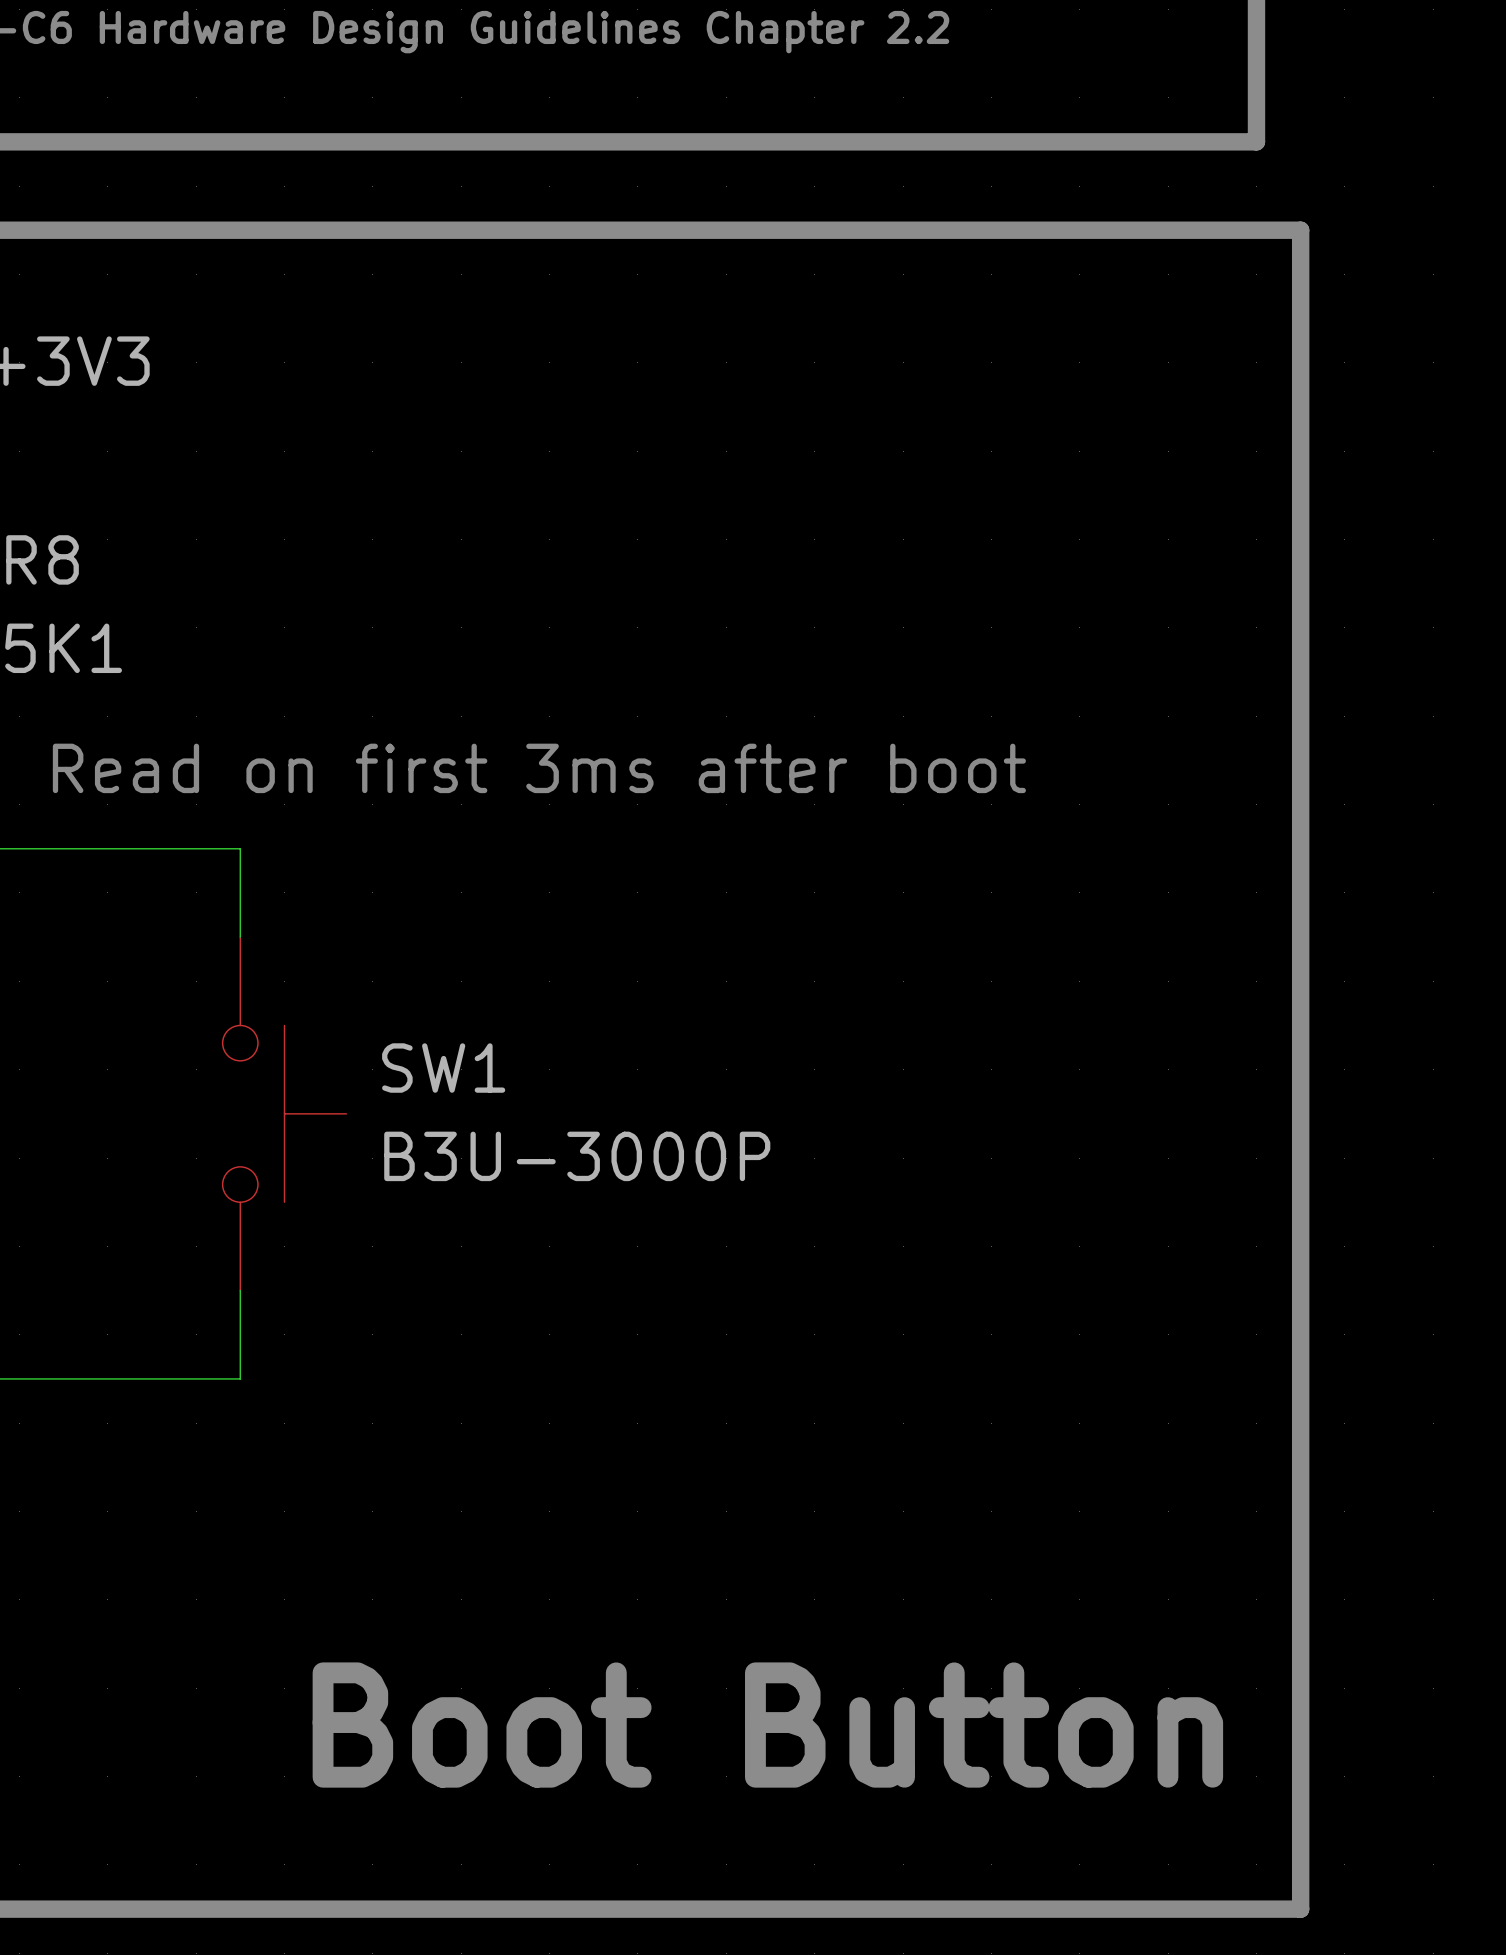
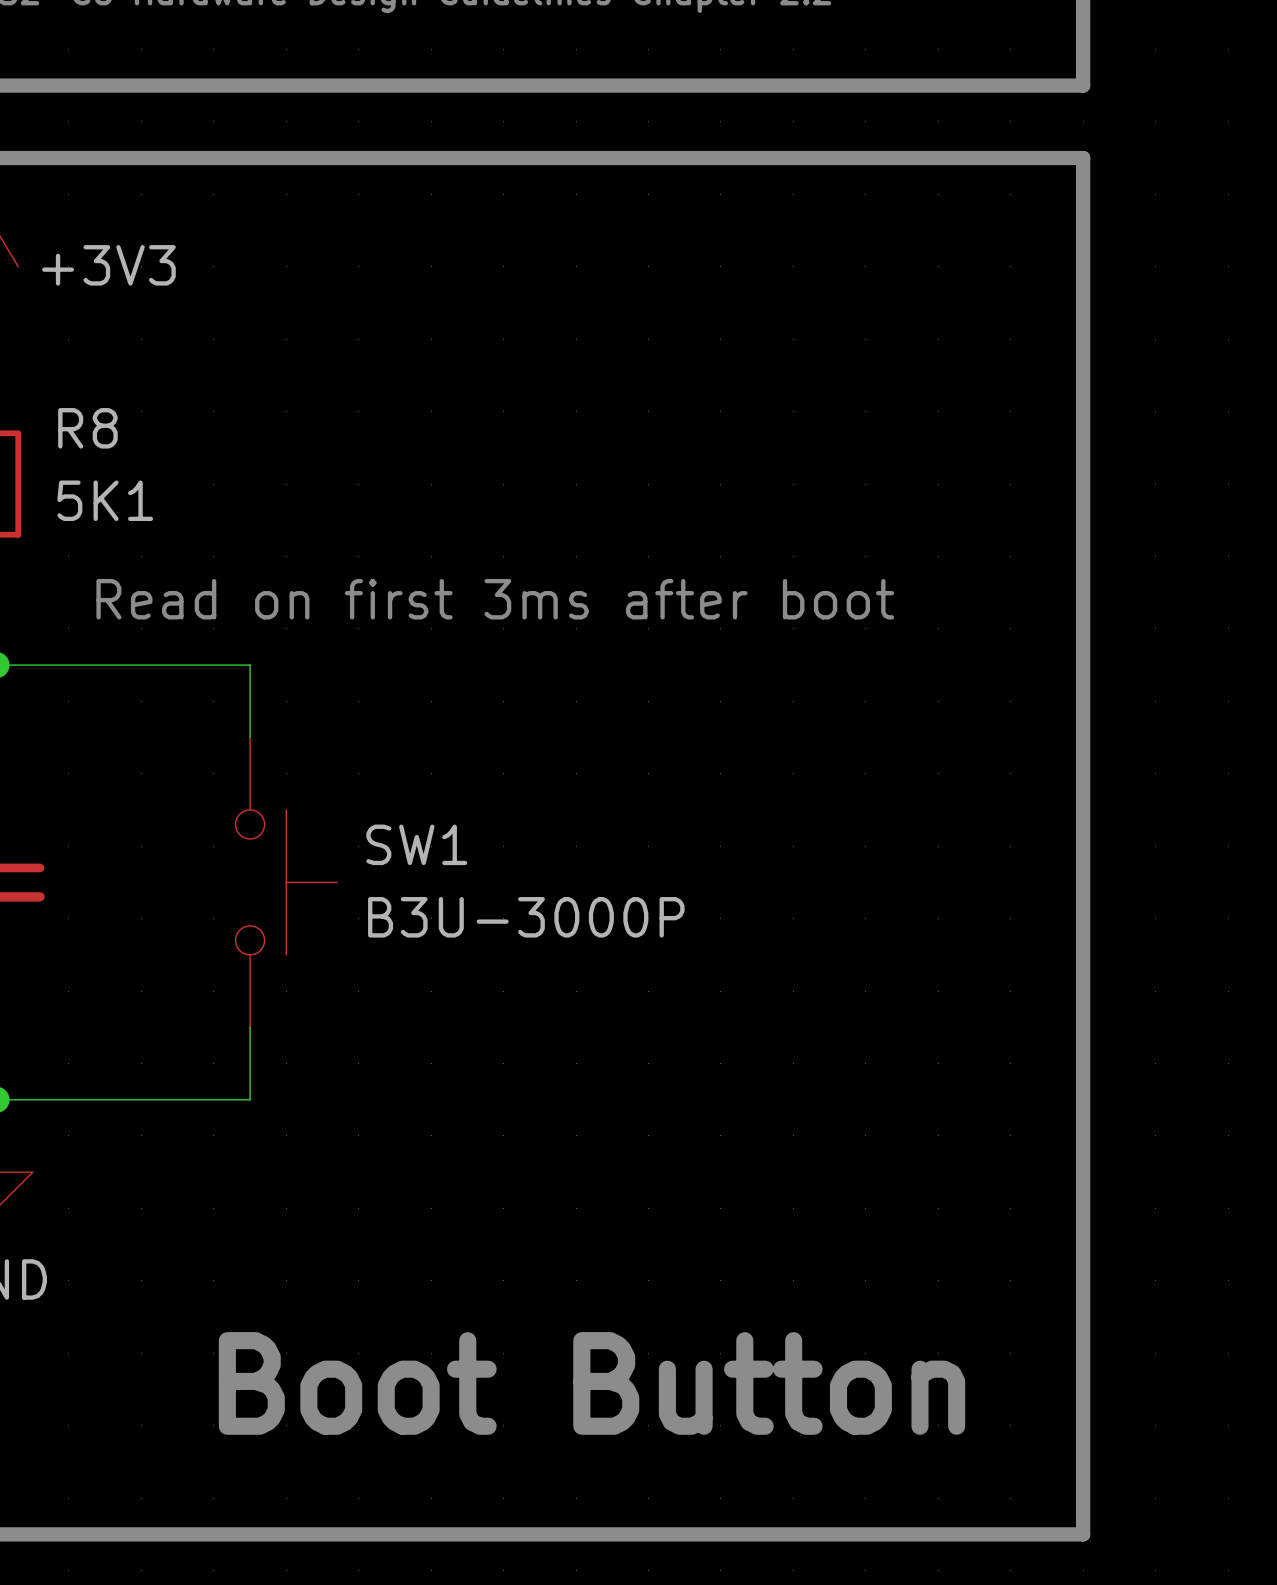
line: (1256, 230) (1300, 230) (1300, 1909) (1256, 1909) -> (1083, 158) (1083, 1534)
text position: Boot Button (767, 1725) -> Boot Button (592, 1383)

